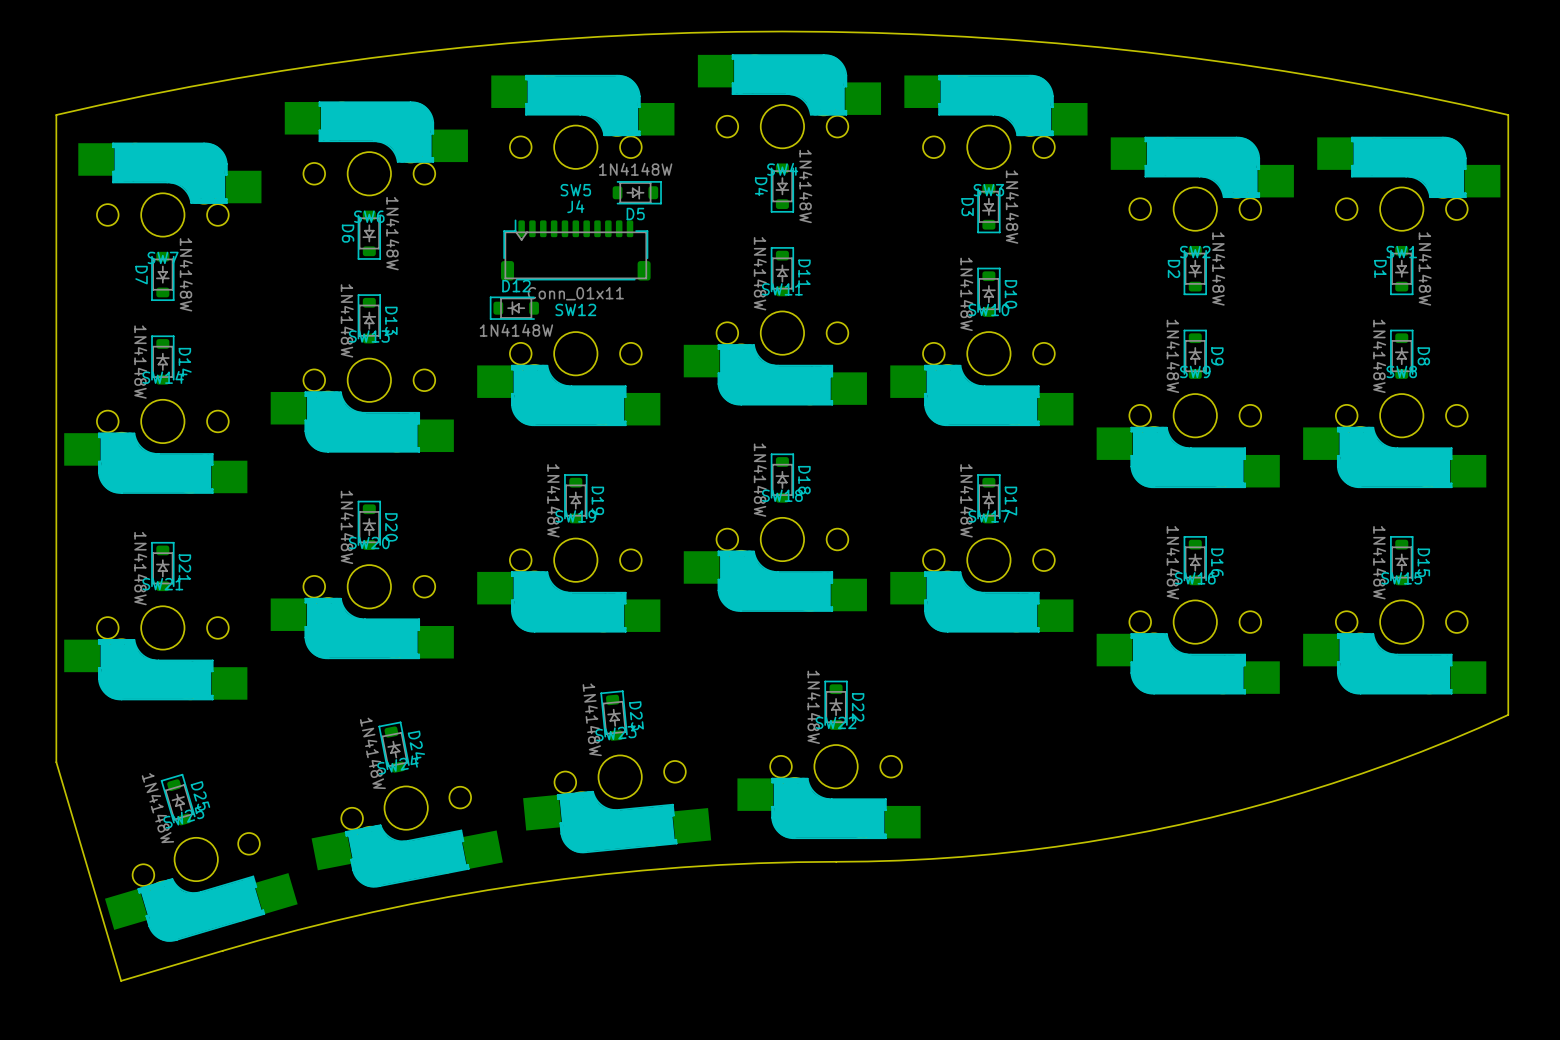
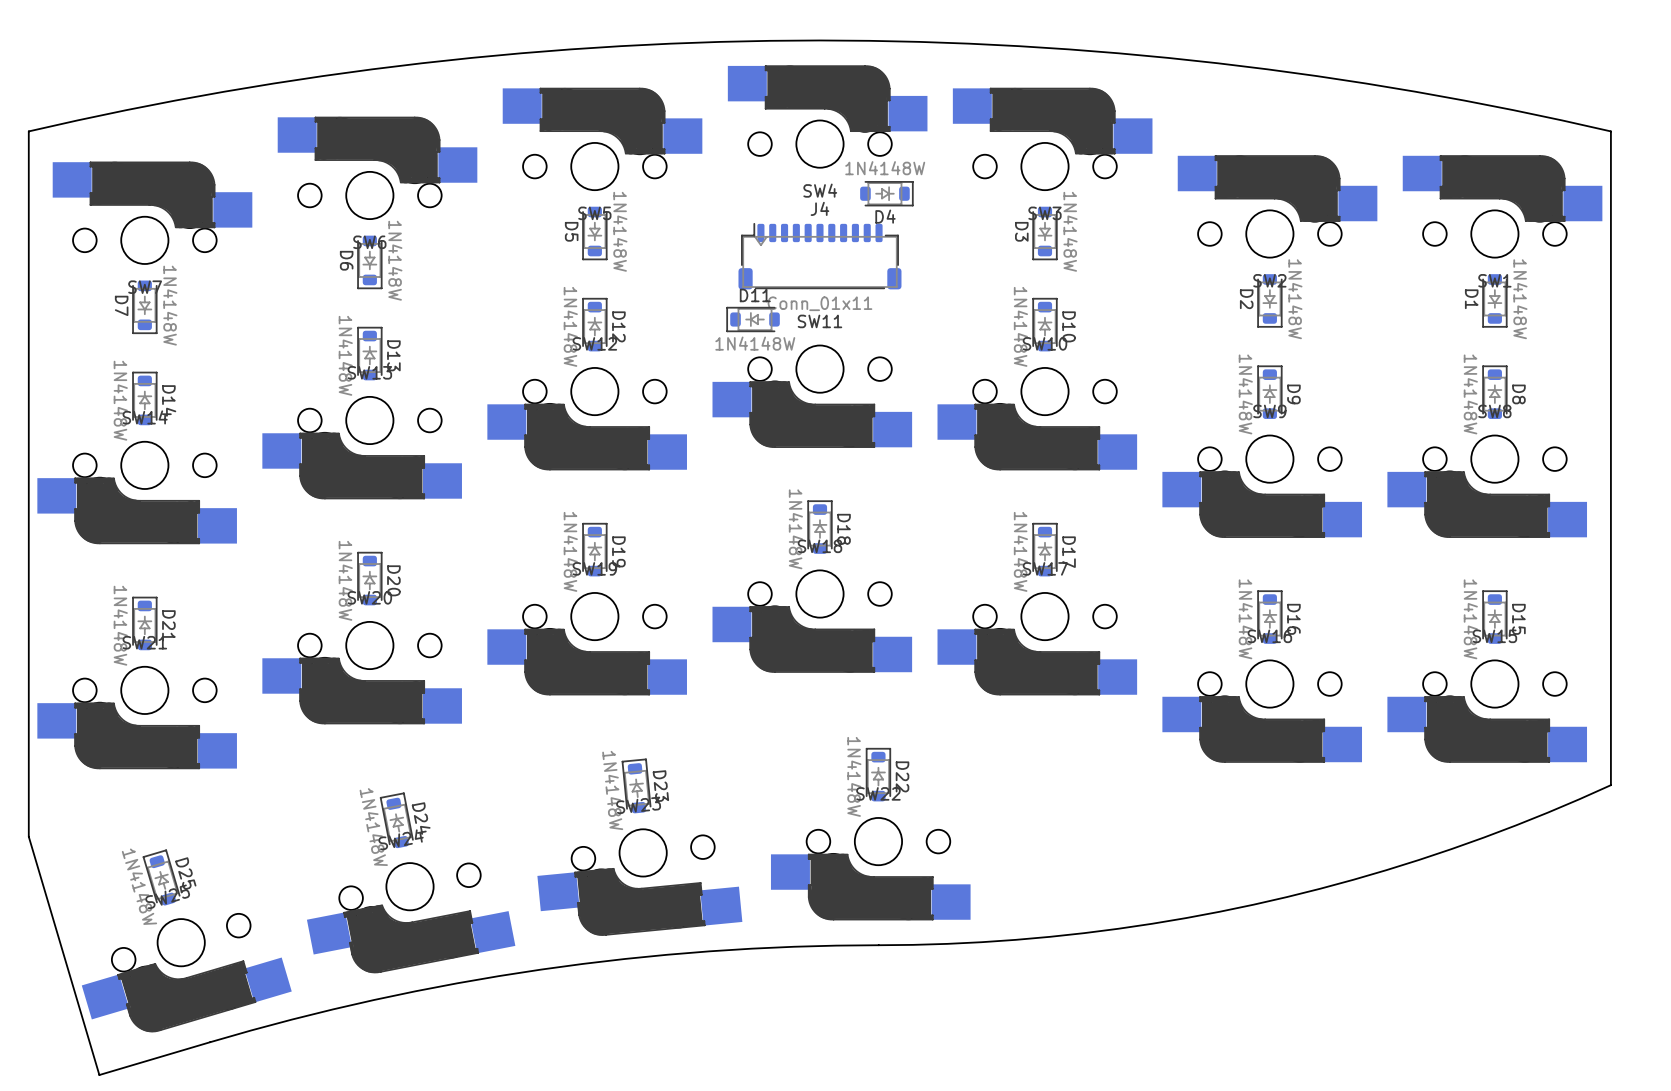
D4 rotation: 0° (782, 187) -> 90° counterclockwise (886, 193)
D4 position: (782, 187) -> (886, 193)
D5 rotation: 0° (637, 192) -> 90° clockwise (594, 233)
D5 position: (637, 192) -> (594, 233)
J4 position: (575, 250) -> (819, 256)
D11 rotation: 0° (782, 271) -> 90° counterclockwise (753, 319)
D11 position: (782, 271) -> (753, 319)
D12 rotation: 0° (514, 308) -> 90° clockwise (594, 324)
D12 position: (514, 308) -> (594, 324)

